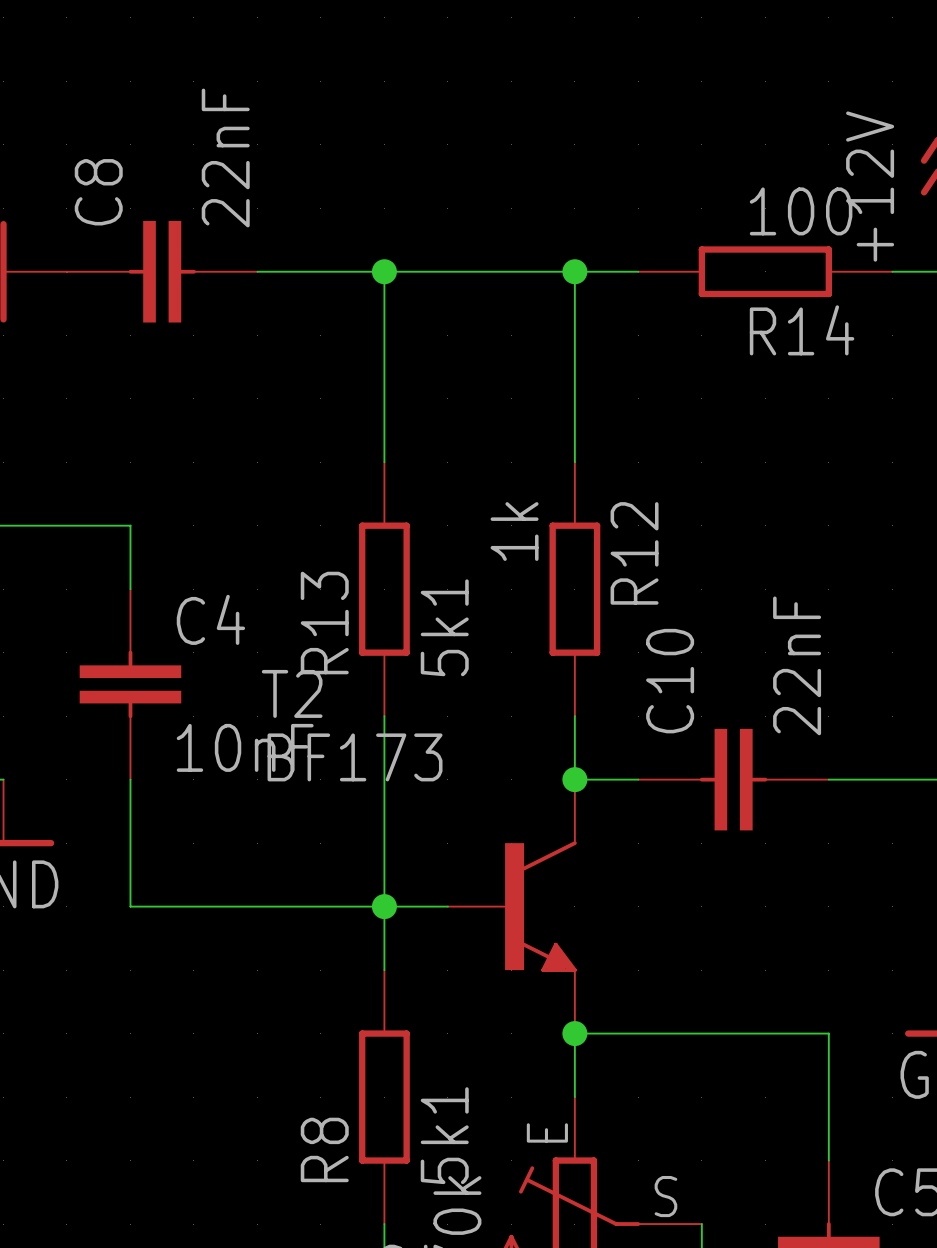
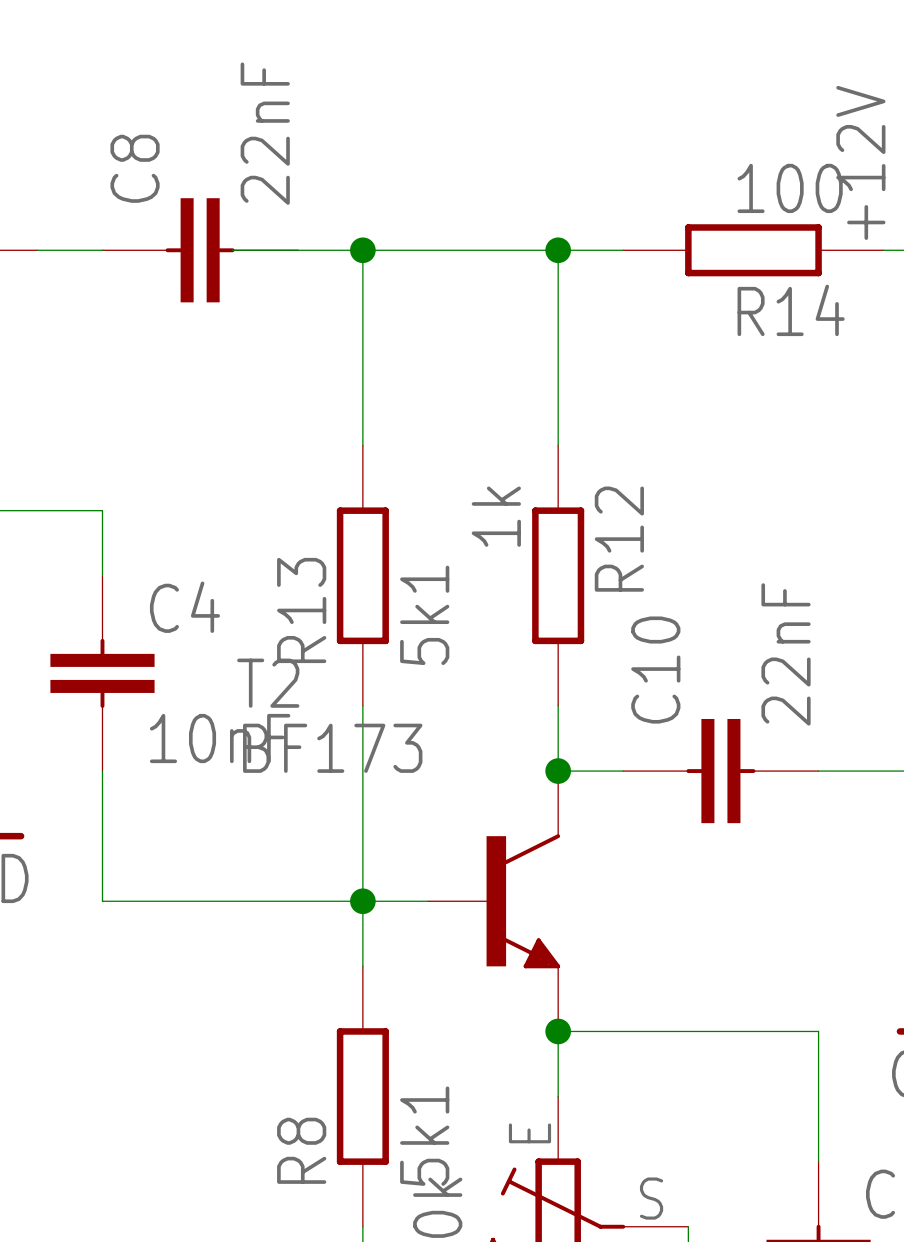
C8 position: (162, 271) -> (200, 250)

